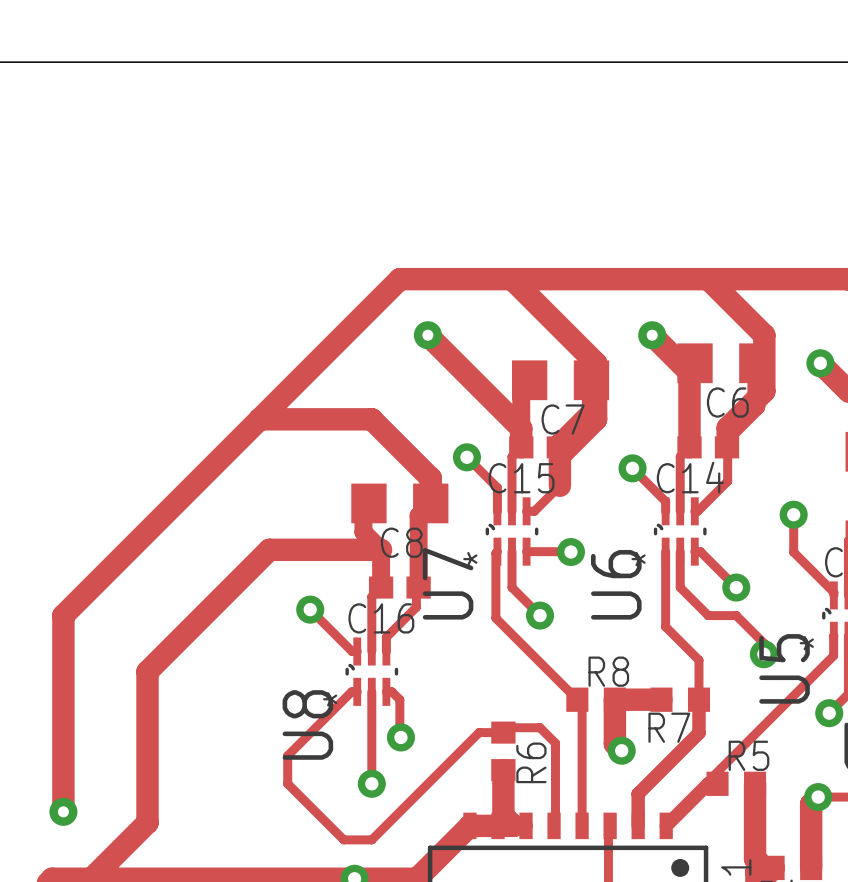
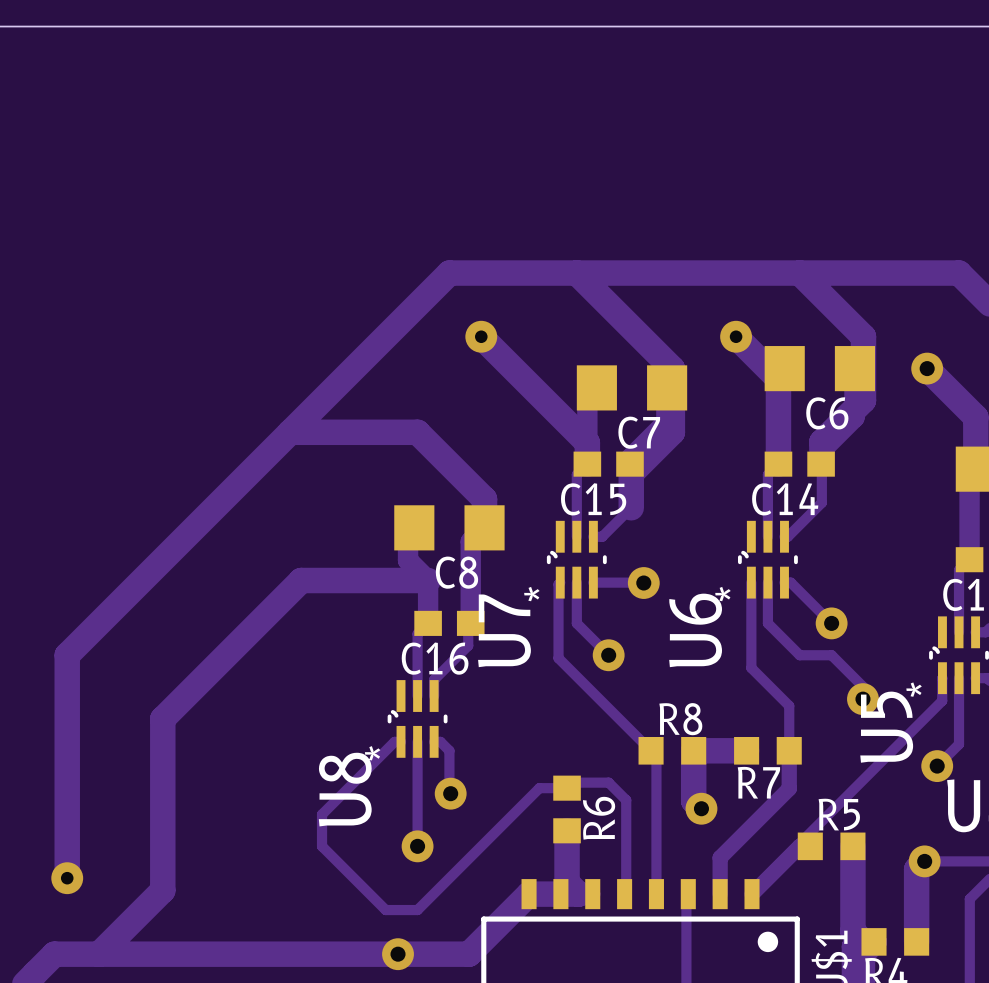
track: (466, 457) (497, 487) (497, 511) -> none
via: (466, 457) -> none
track: (632, 468) (665, 501) (665, 511) -> none
via: (632, 468) -> none
track: (793, 514) (793, 552) (833, 592) (833, 595) -> none
via: (793, 514) -> none
track: (310, 609) (352, 651) (357, 651) -> none
via: (310, 609) -> none

